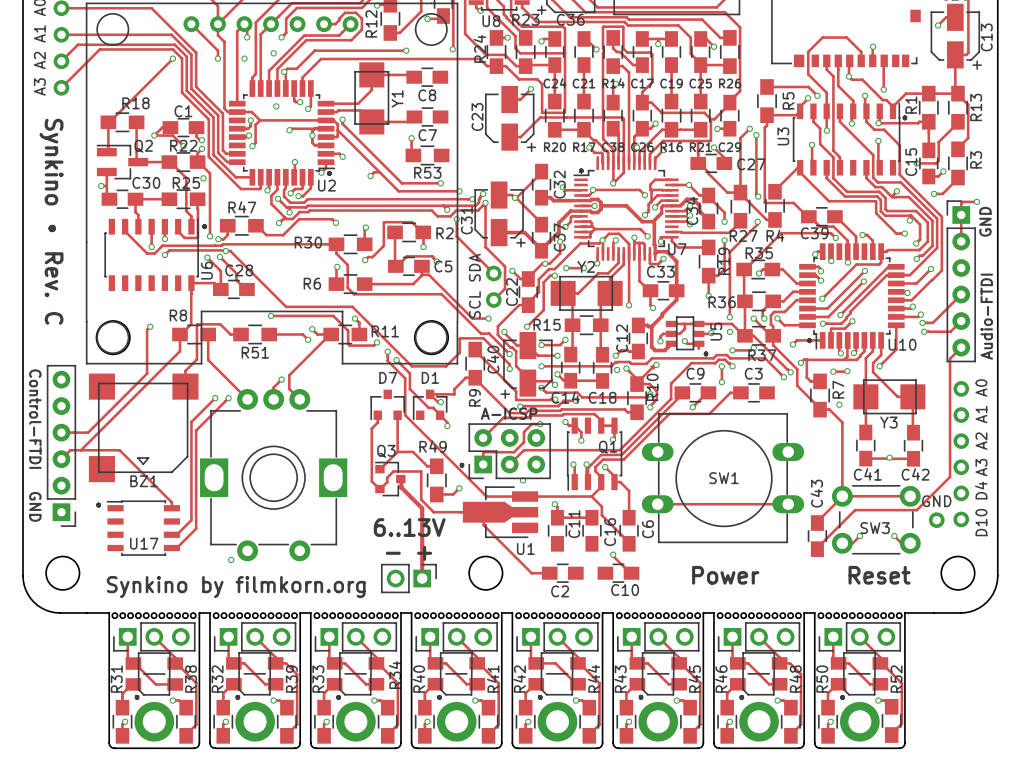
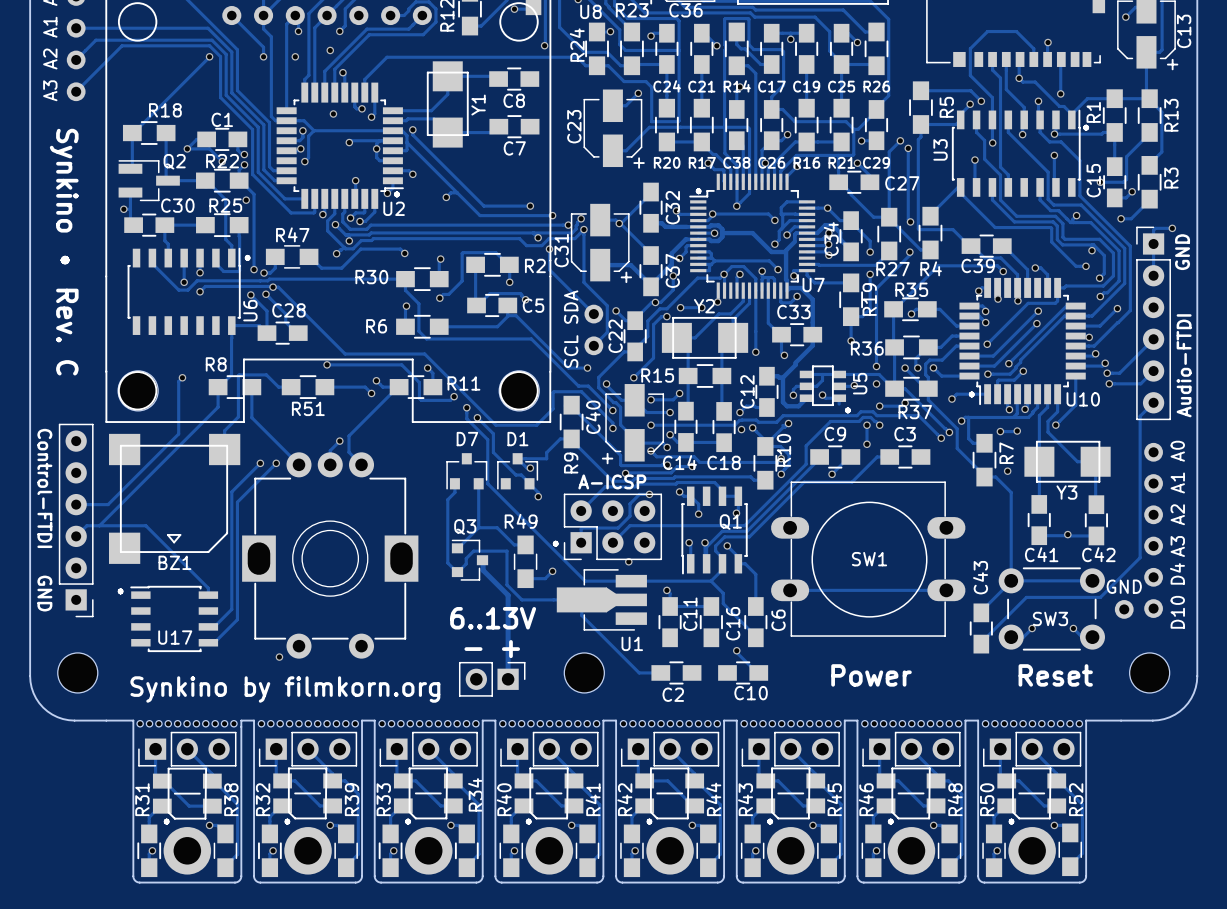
track: (406, 50) (314, 50) (296, 68) (287, 68) (284, 71) -> none
via: (406, 50) -> none
track: (411, 138) (411, 153) (413, 155) -> none
via: (411, 138) -> none
R53: (427, 155) -> none

